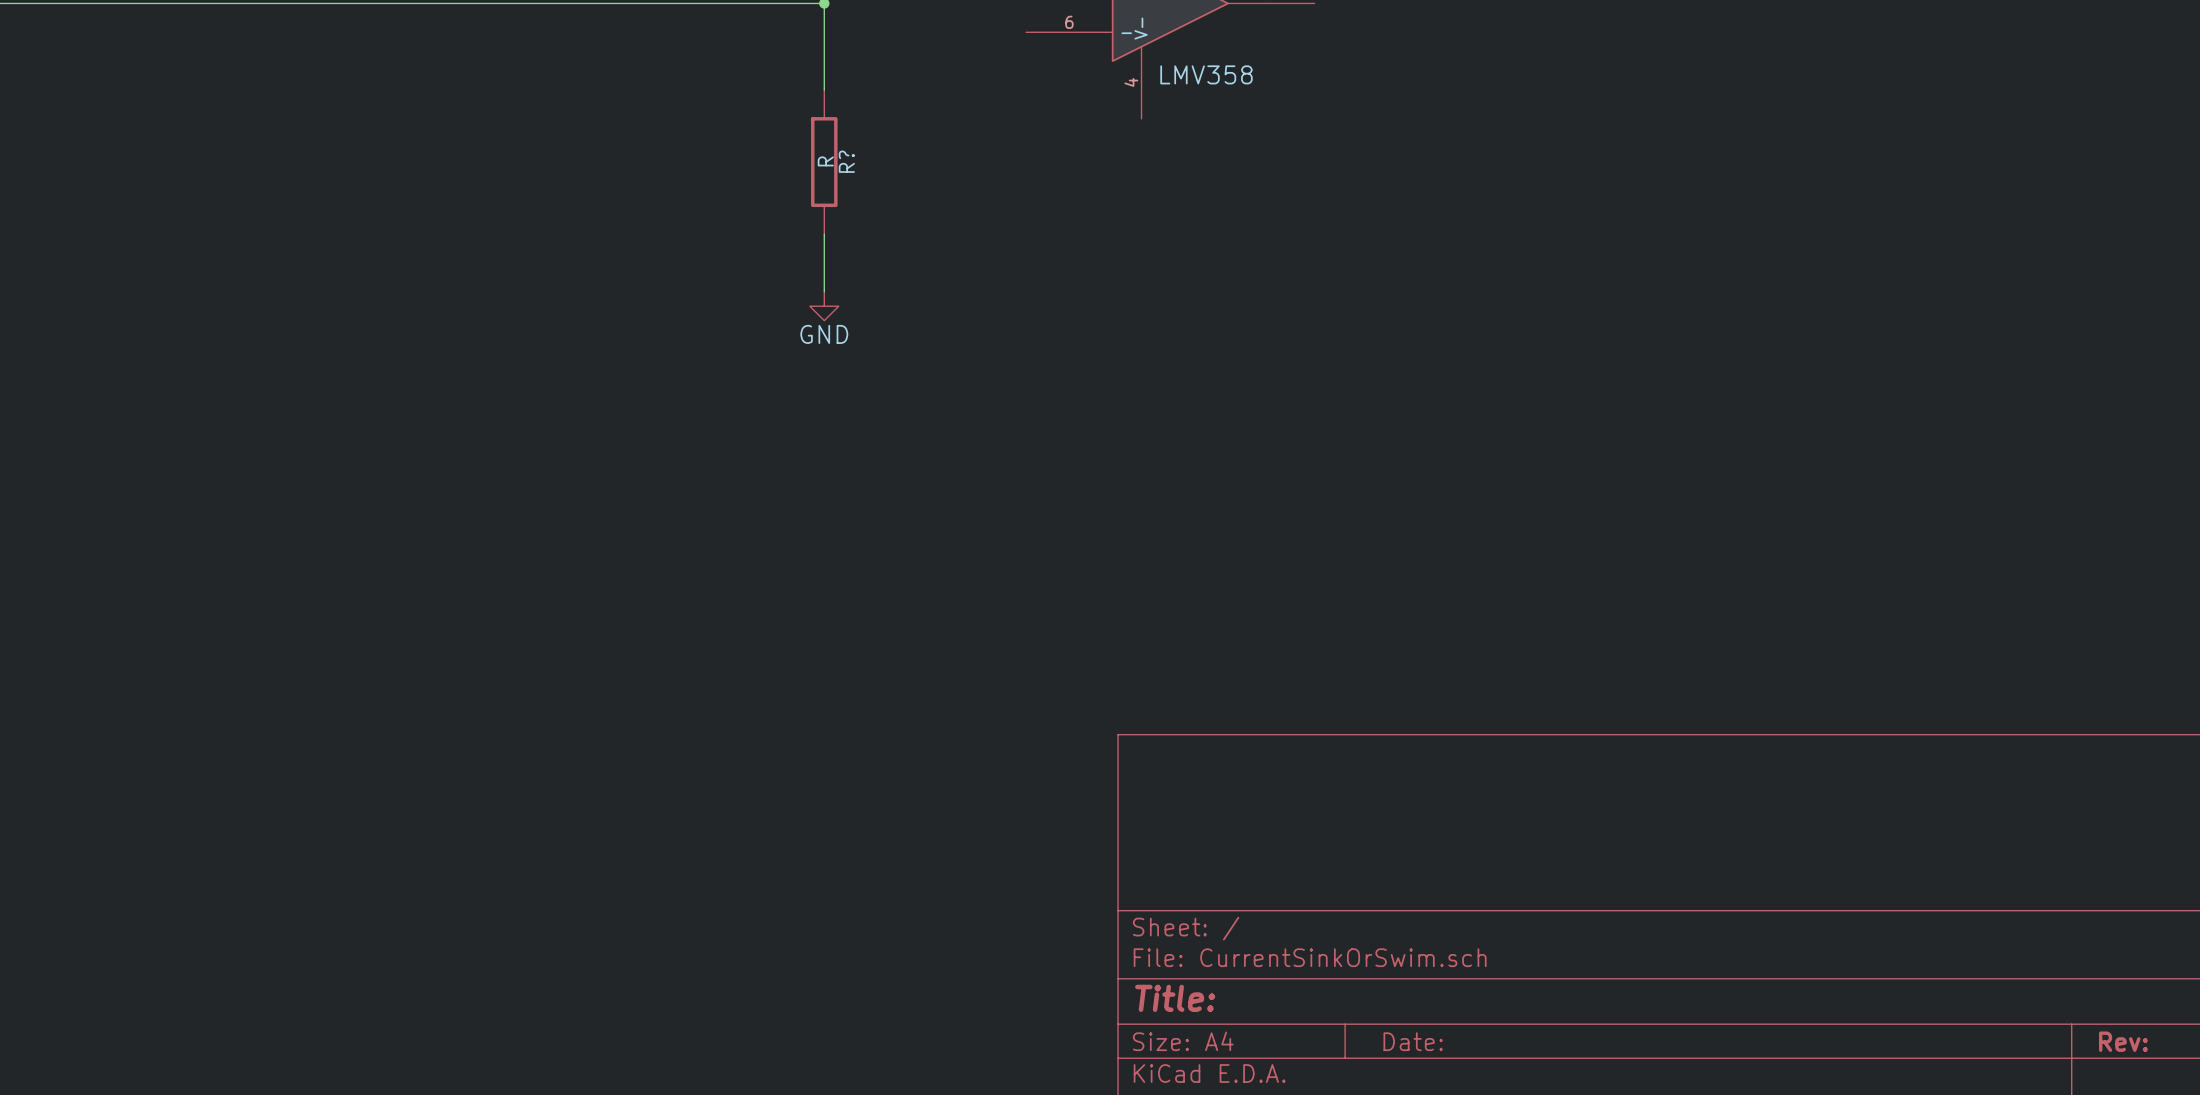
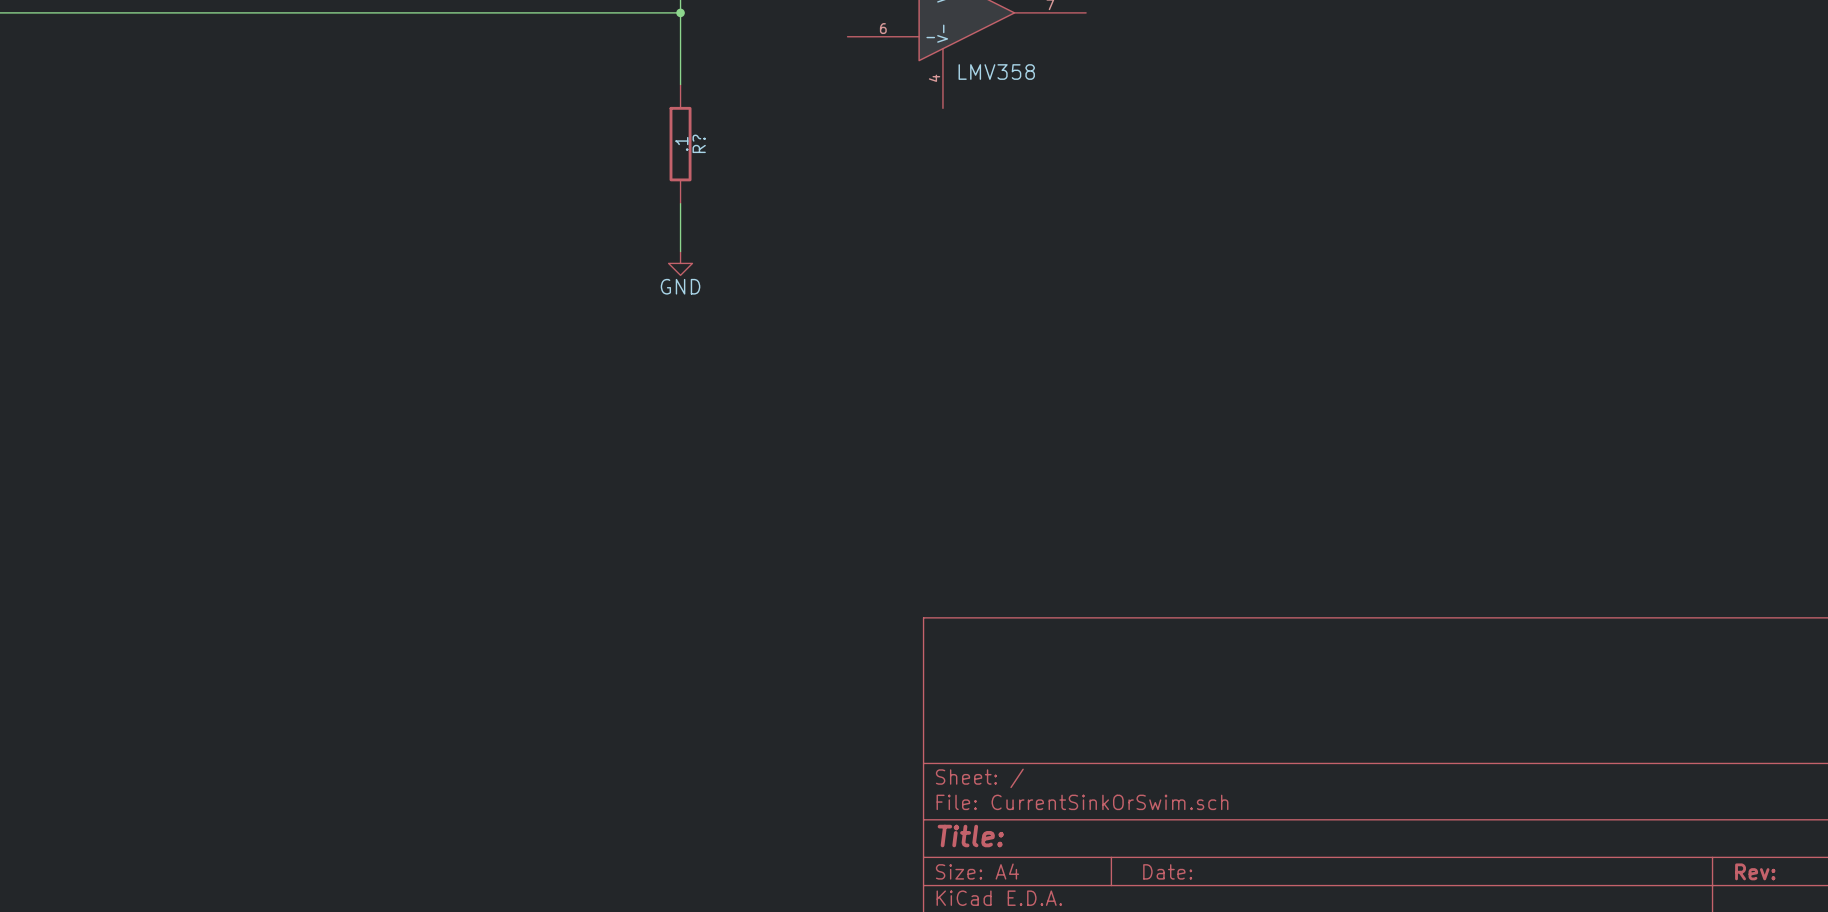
R? value: R (825, 161) -> .1 (681, 143)

